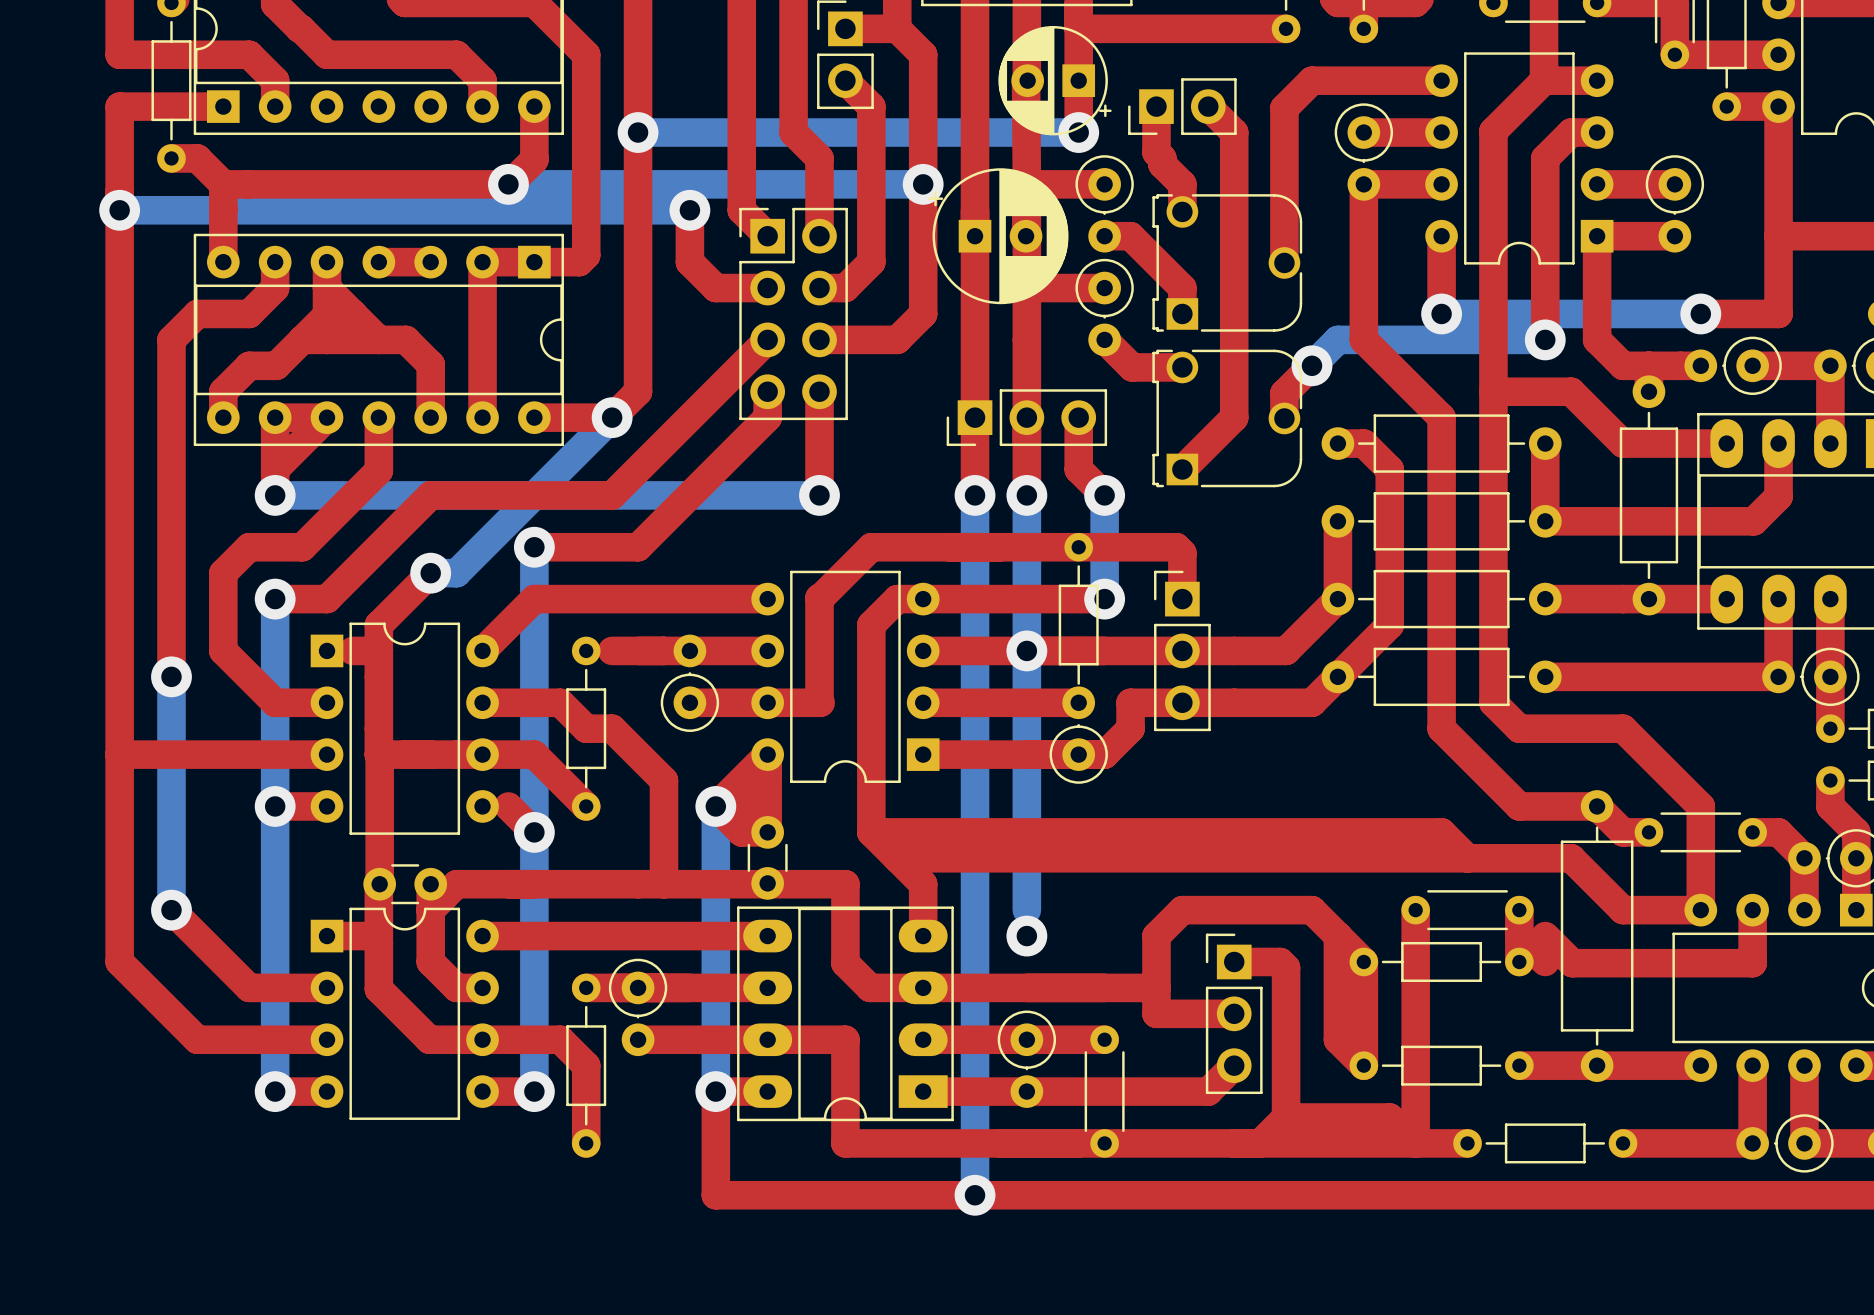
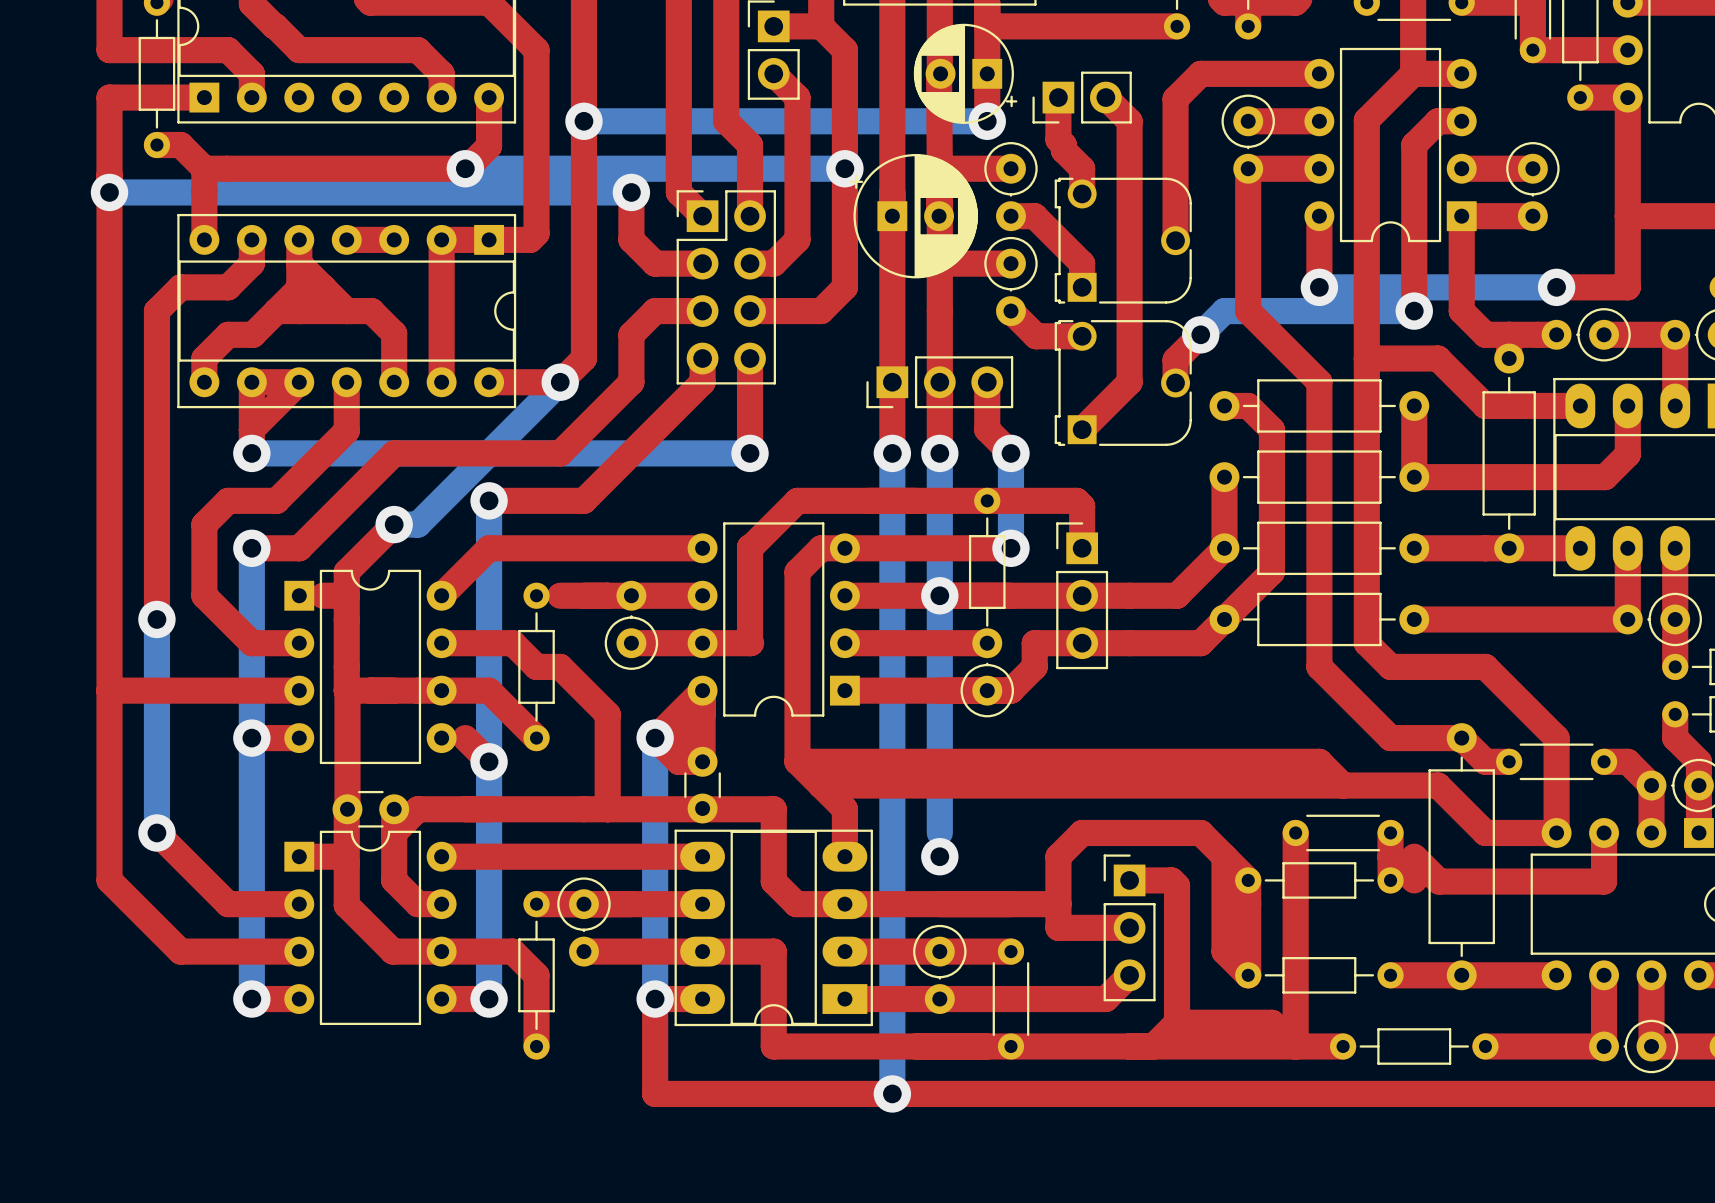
top track: (767, 339) (689, 417) -> (702, 311) (655, 311) (631, 334) (631, 382)

